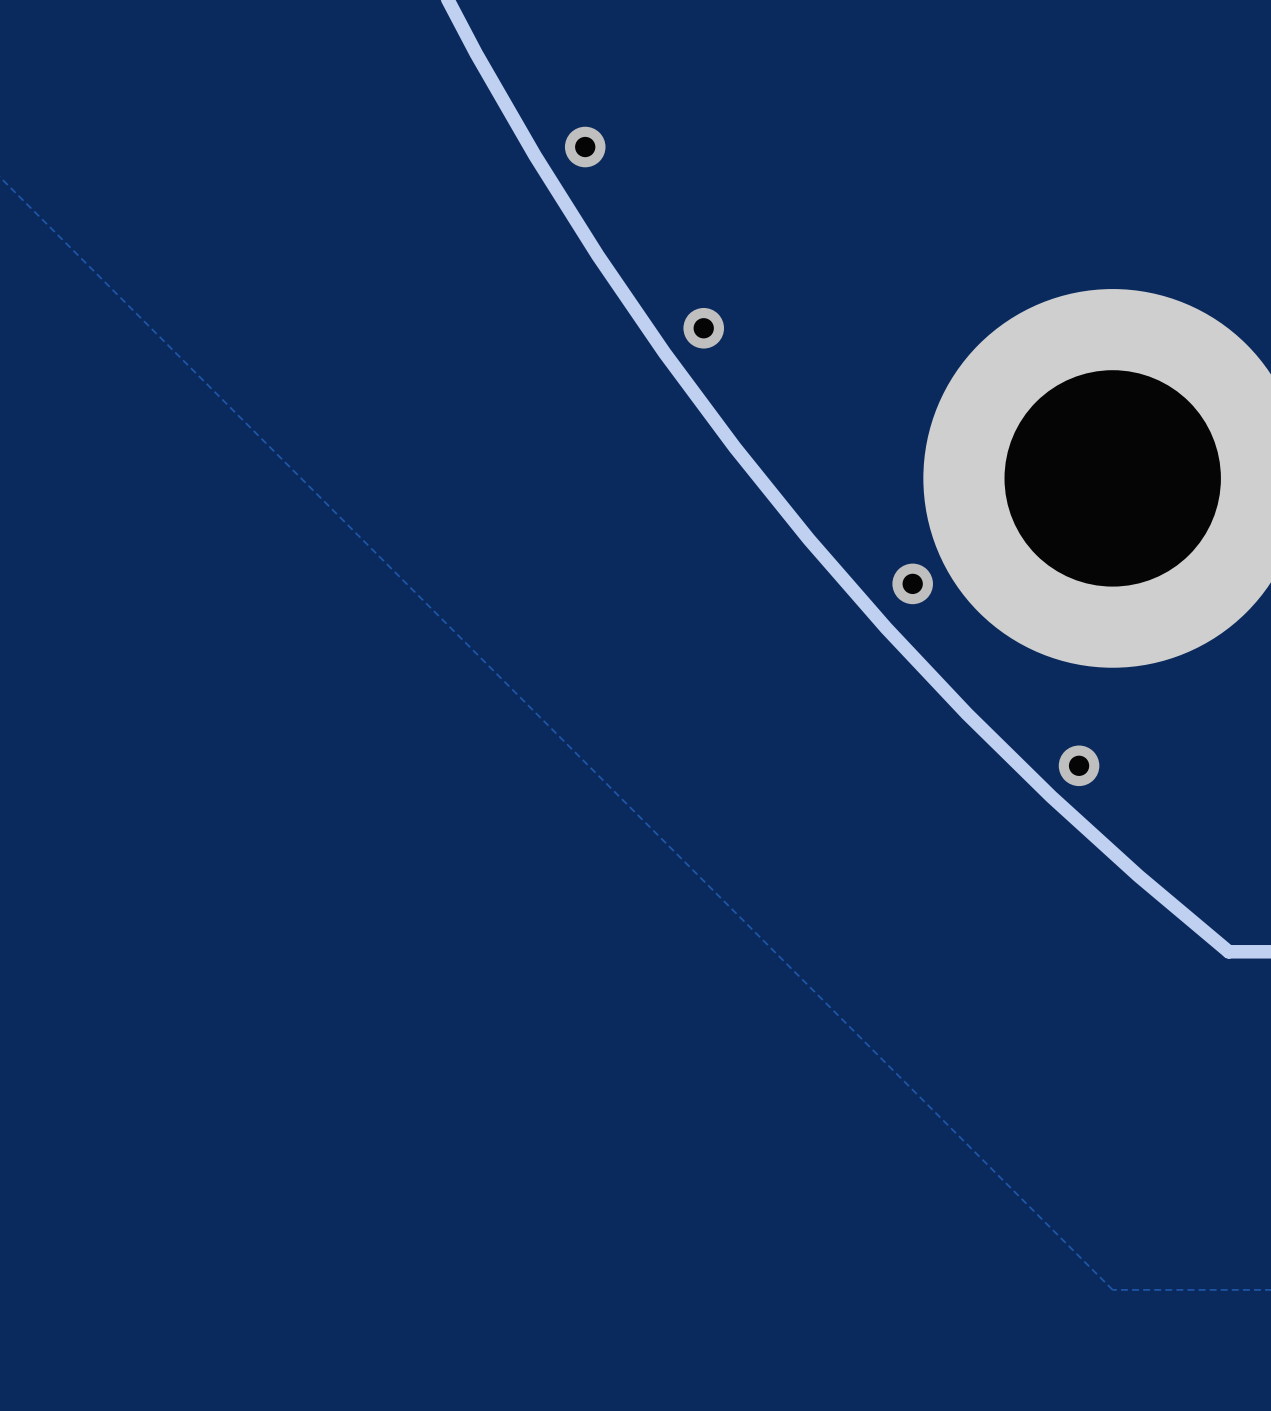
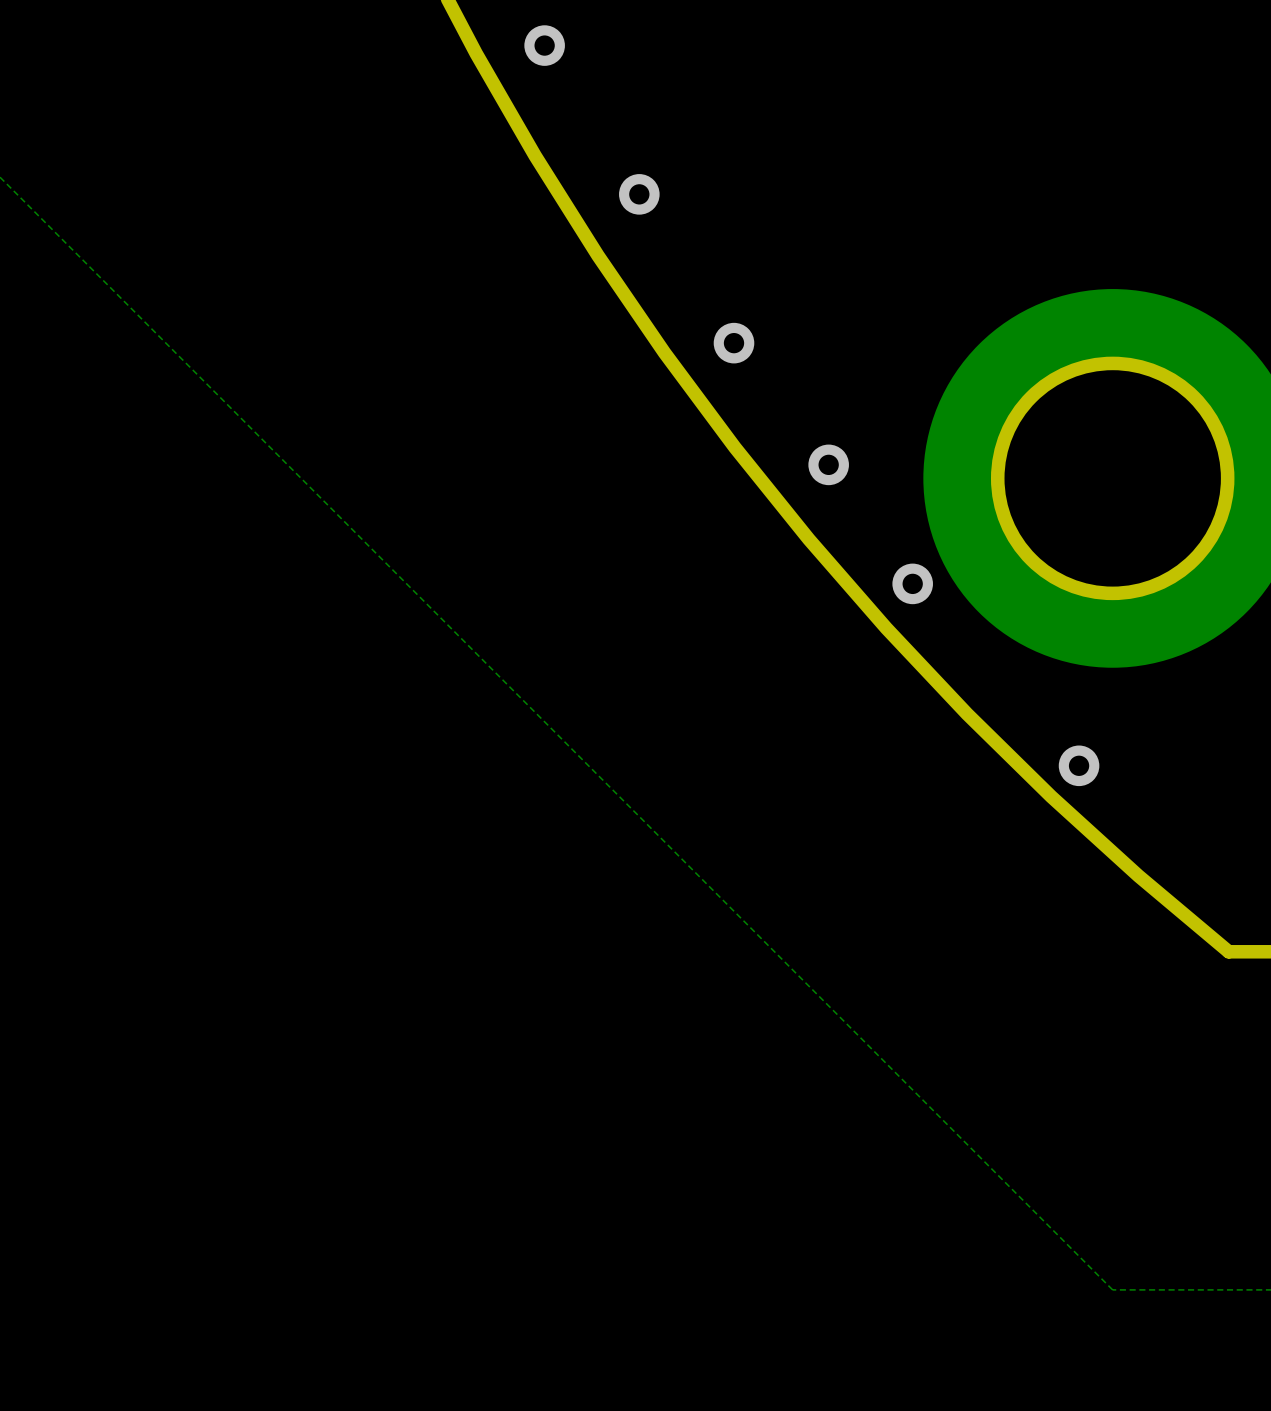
via: none -> (544, 45)
via: (585, 147) -> none
via: none -> (639, 194)
via position: (703, 328) -> (734, 343)
via: none -> (828, 464)

